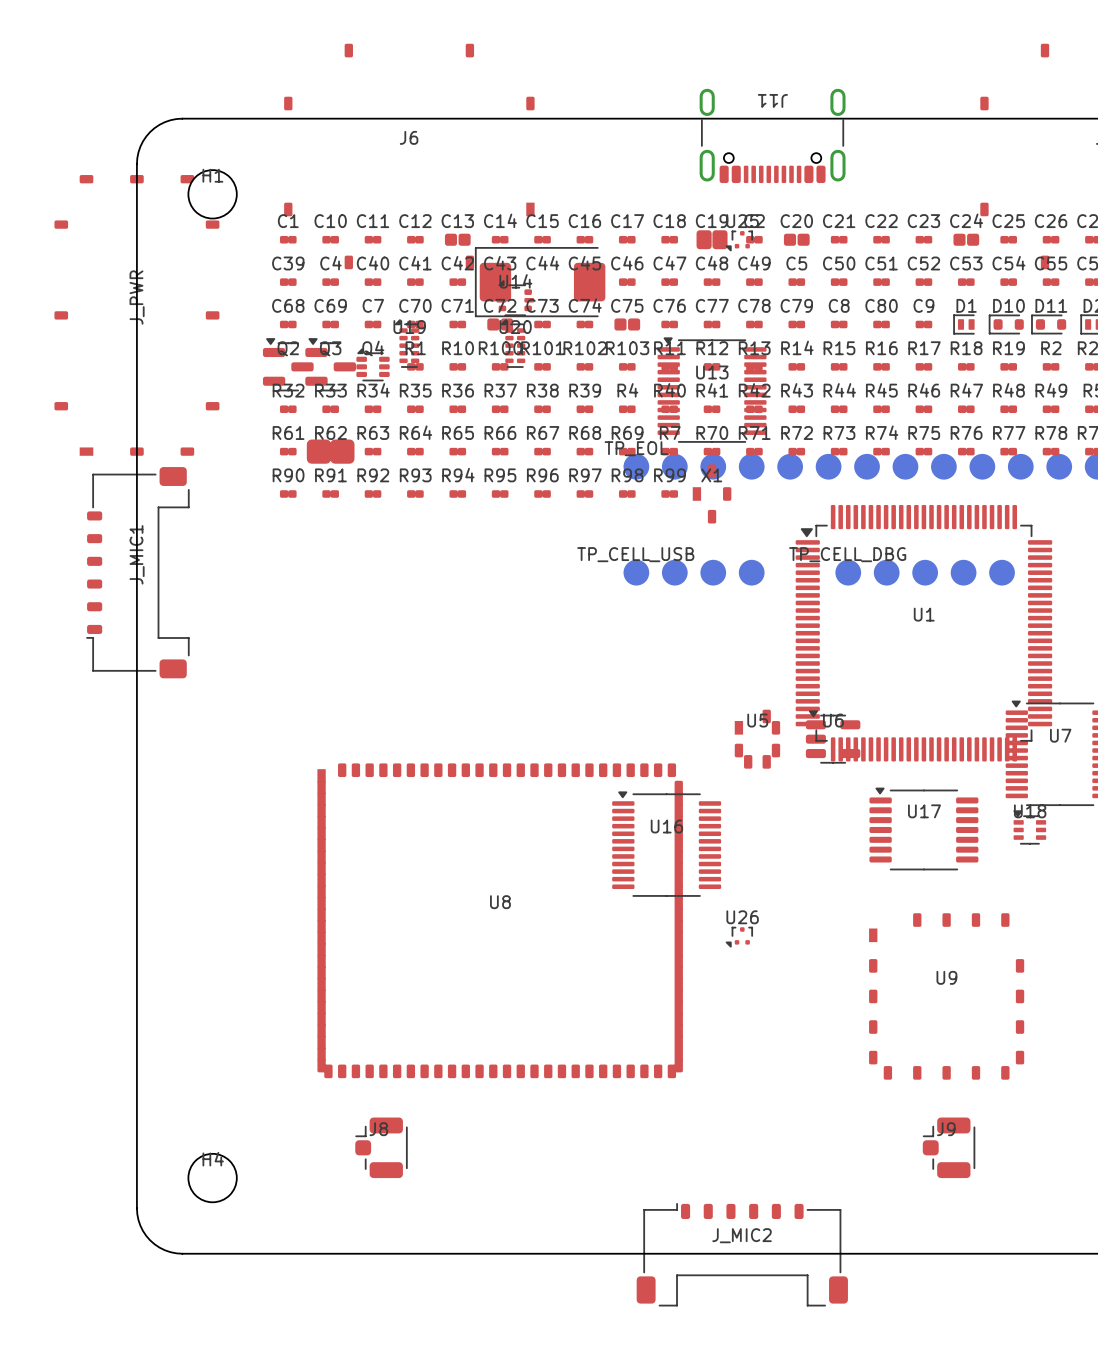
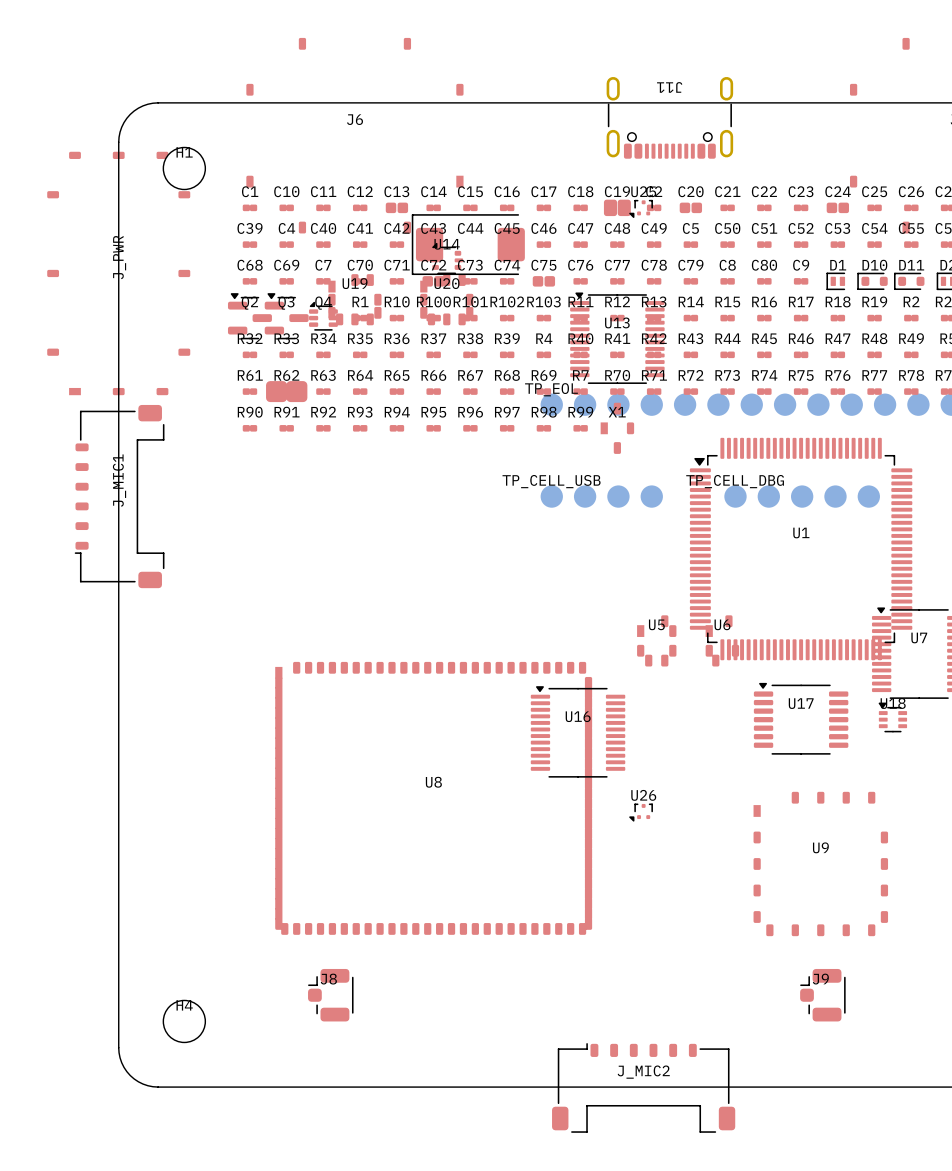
U19 footprint: [394, 319, 420, 368] -> [328, 274, 382, 326]
U20 footprint: [500, 319, 526, 368] -> [420, 274, 474, 326]
U6 footprint: [805, 710, 861, 764] -> [705, 615, 740, 667]

